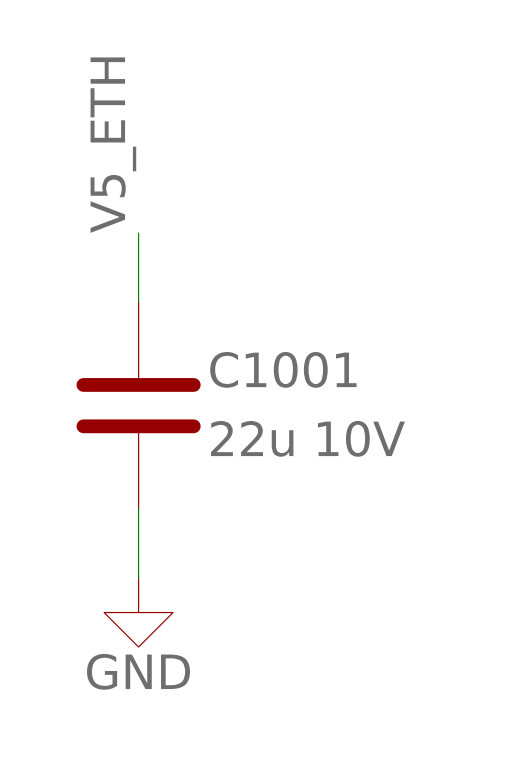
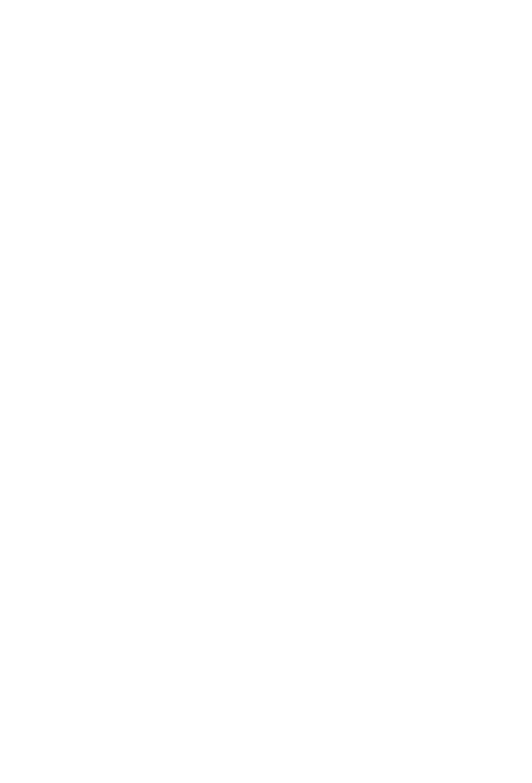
label: V5_ETH (113, 145) -> none
wire: (138, 233) (138, 302) -> none
C1001: 22u 10V (138, 405) -> none
wire: (138, 509) (138, 578) -> none
power symbol: GND (138, 612) -> none

